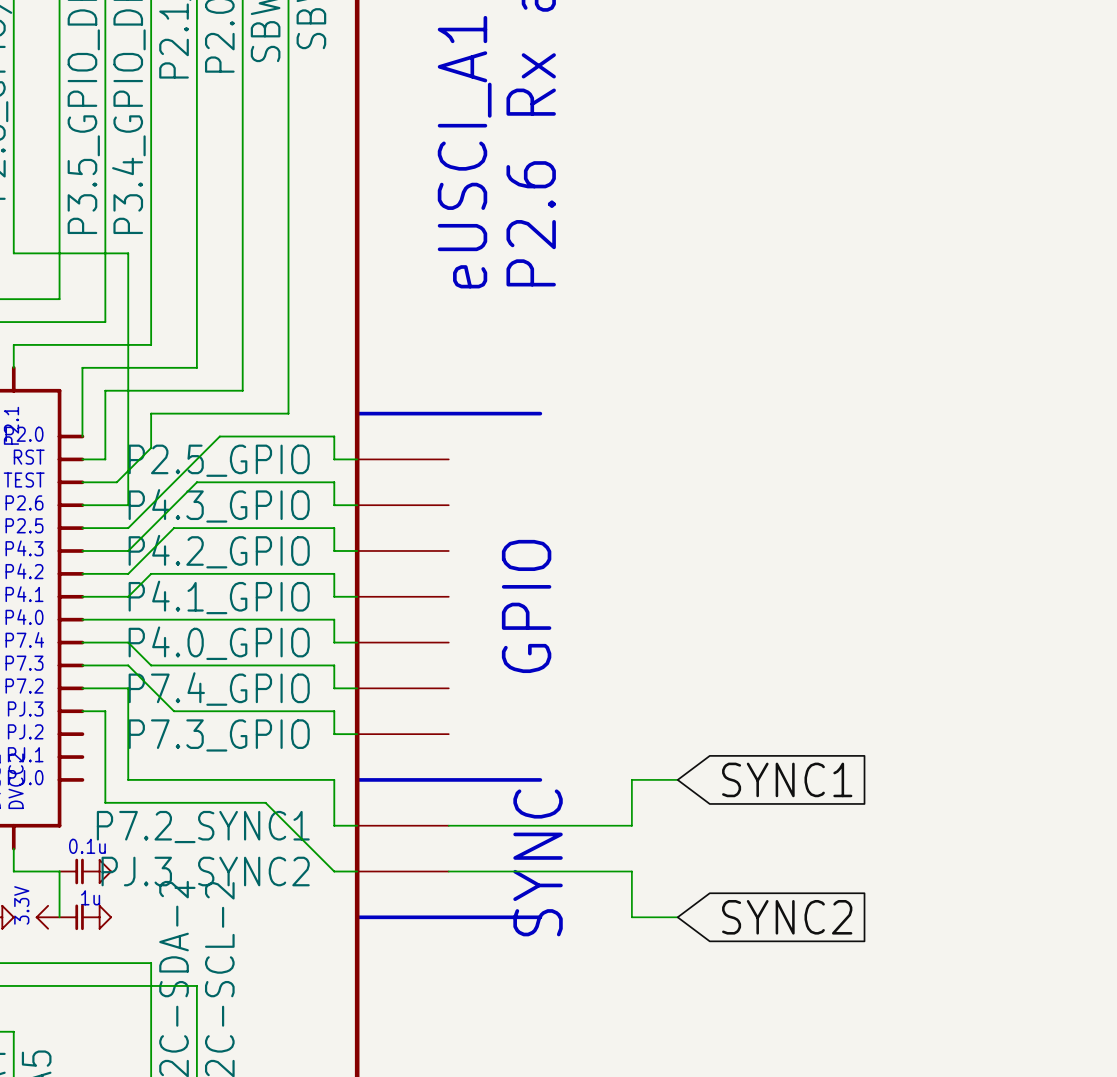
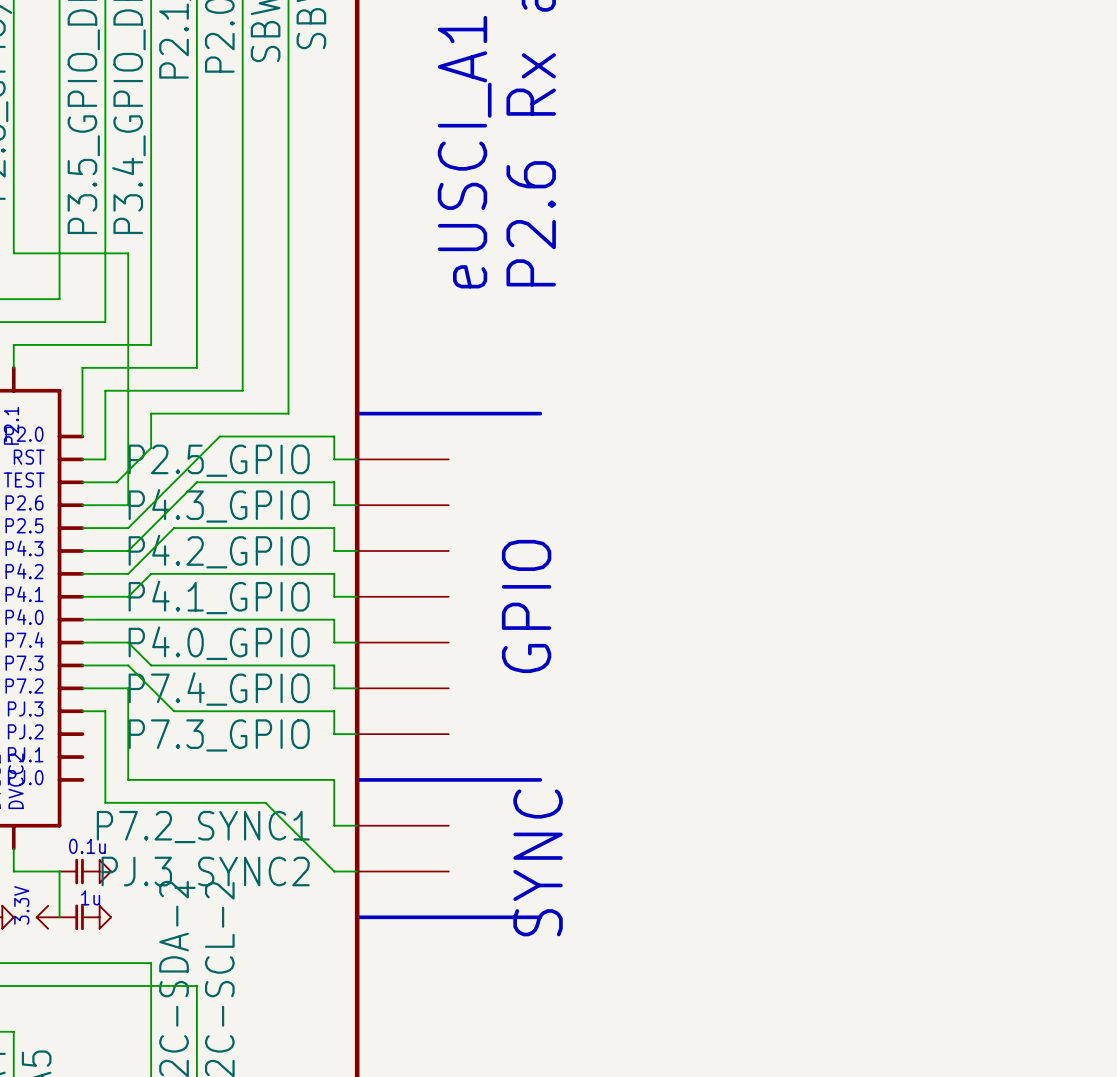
wire: (677, 779) (631, 779) (631, 825) (448, 825) -> none
global label: SYNC1 (787, 779) -> none
wire: (448, 871) (631, 871) (631, 917) (677, 917) -> none
global label: SYNC2 (787, 917) -> none

